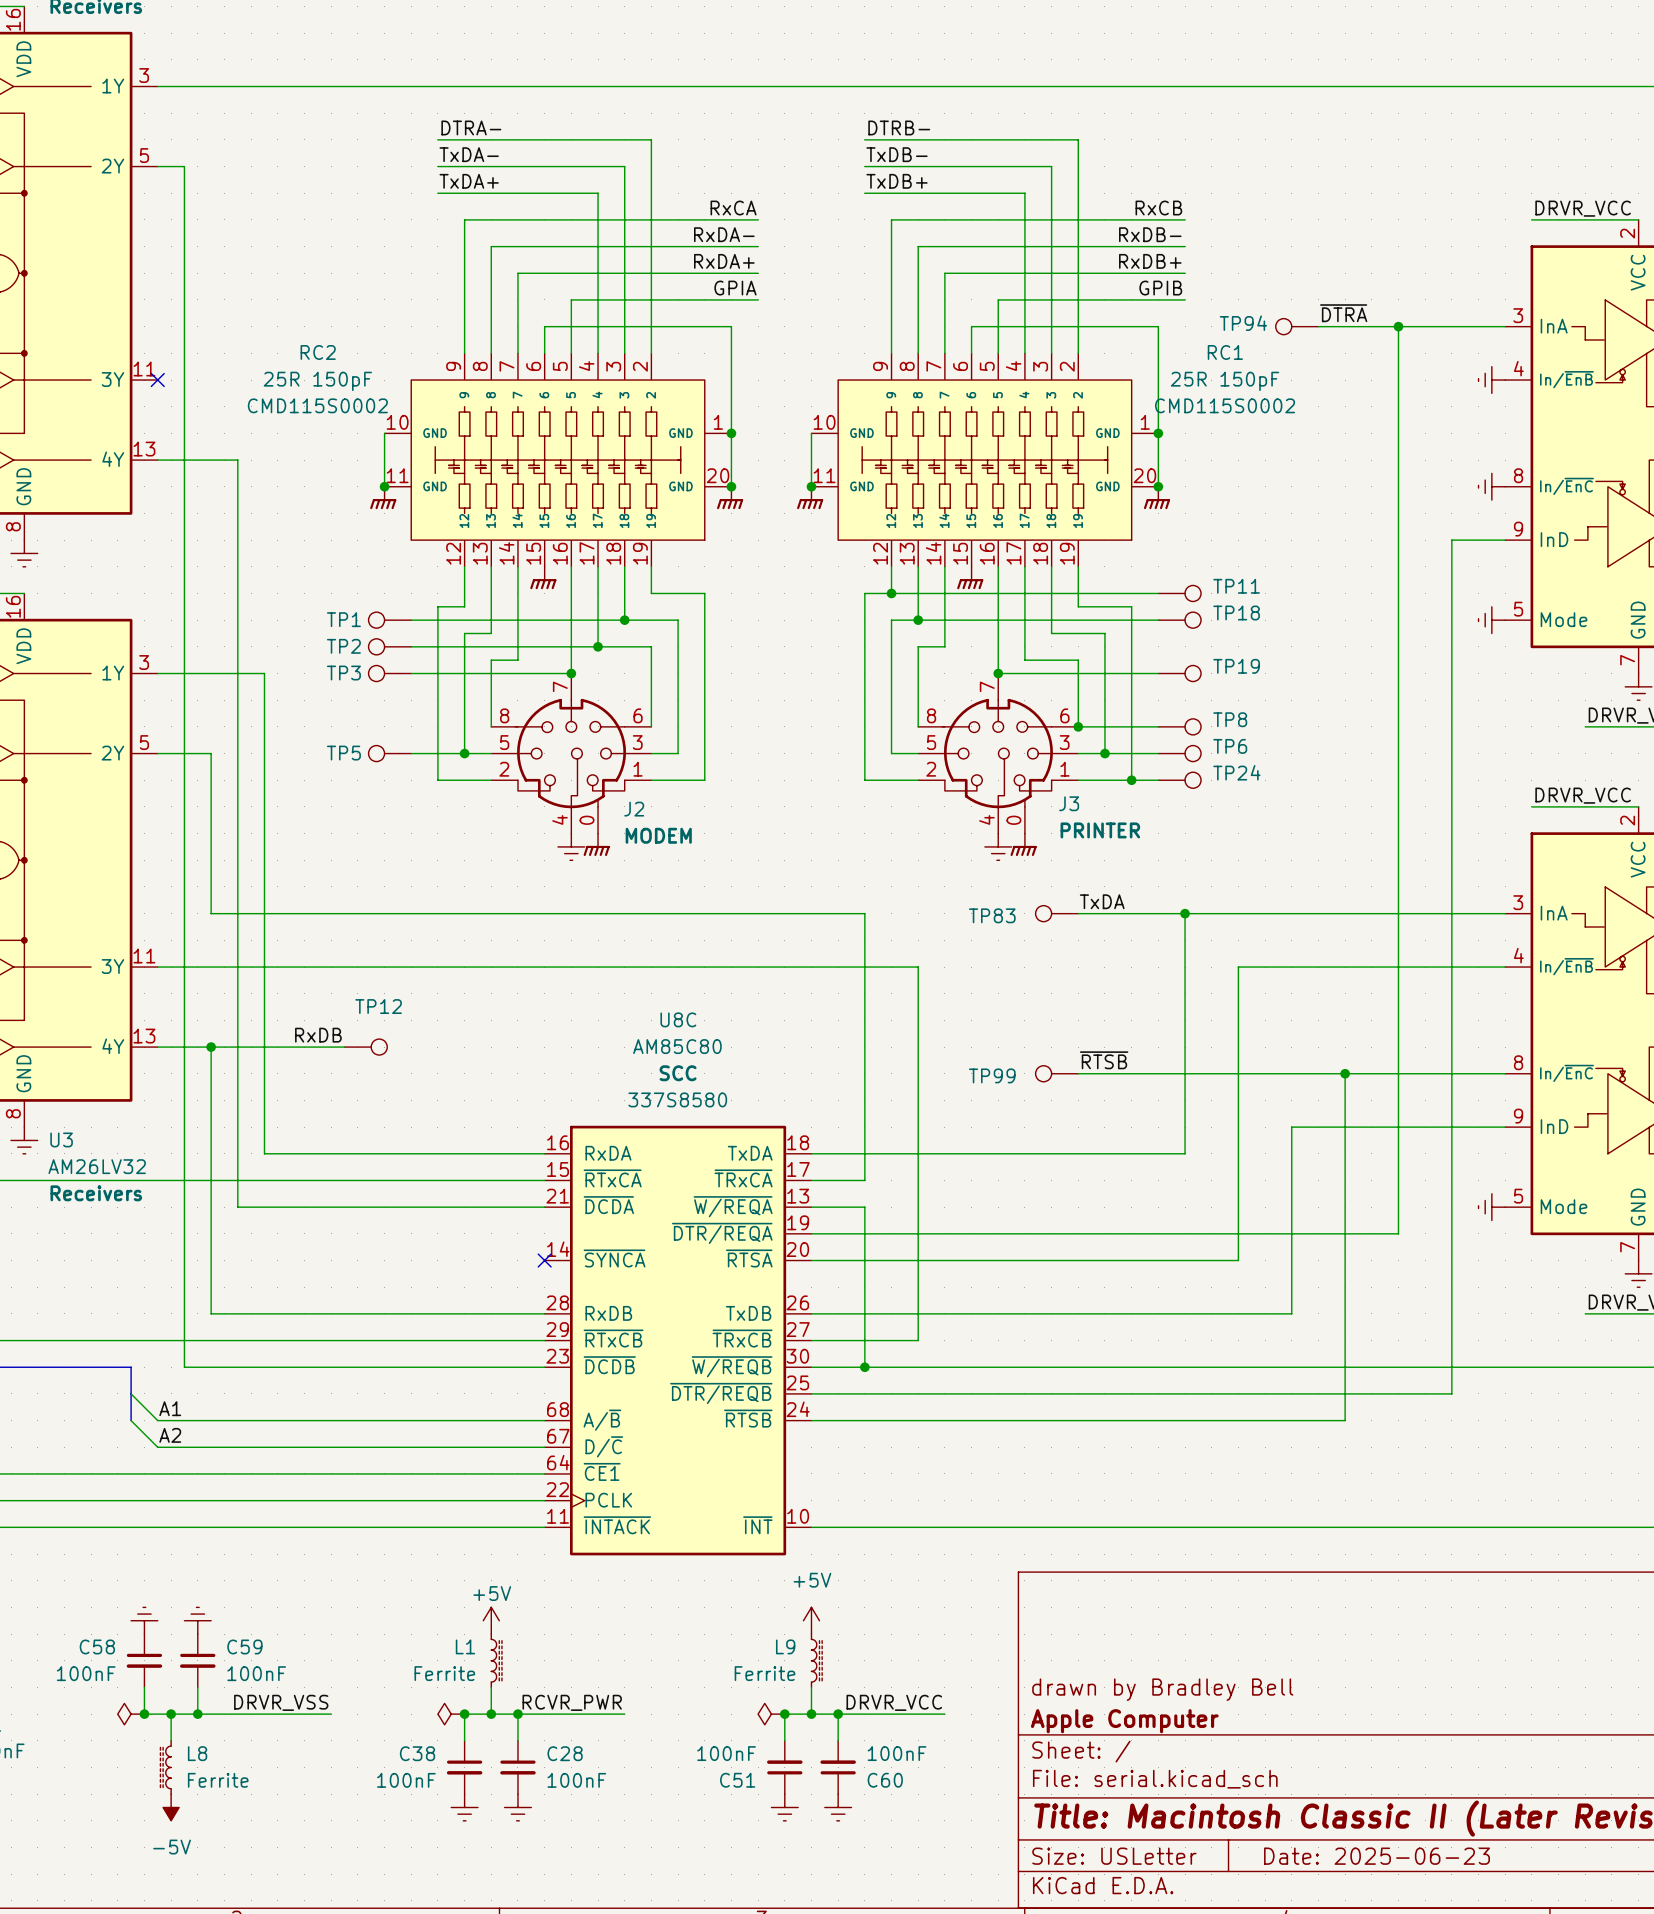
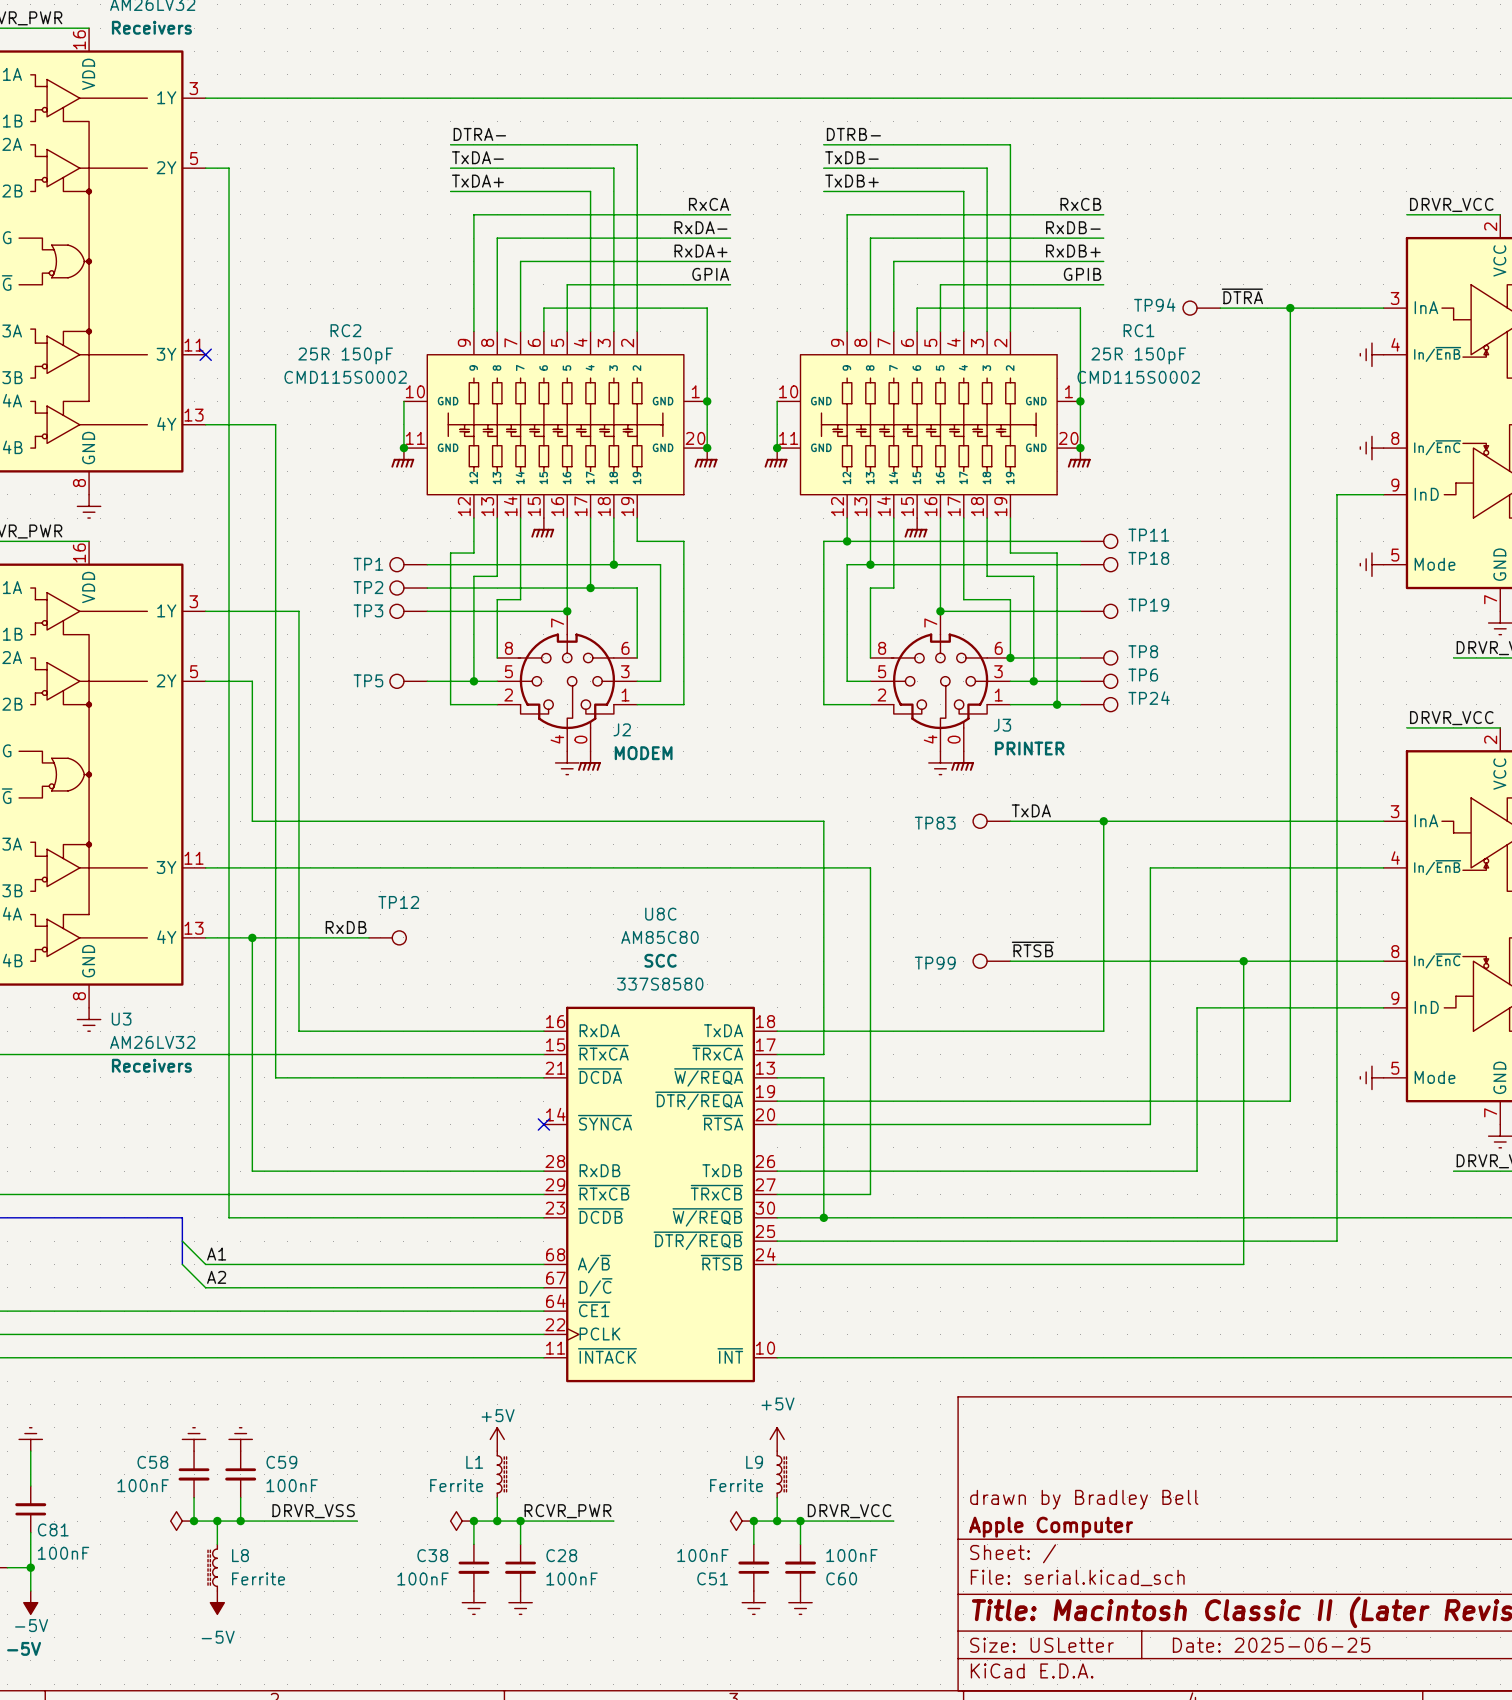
title block: Date: 2025-06-23 (1377, 1856) -> Date: 2025-06-25 (1271, 1645)

